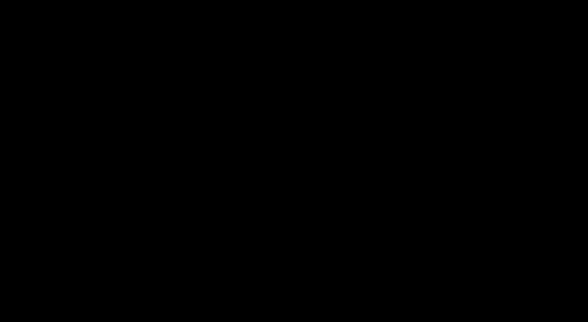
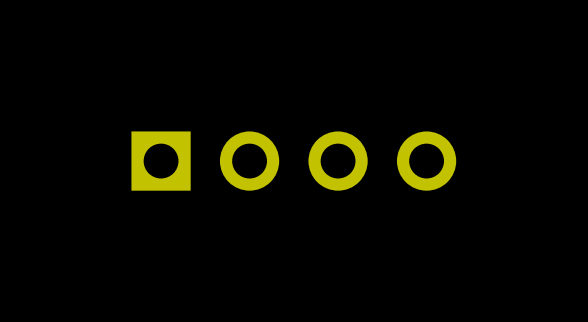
part: none -> (293, 161)

